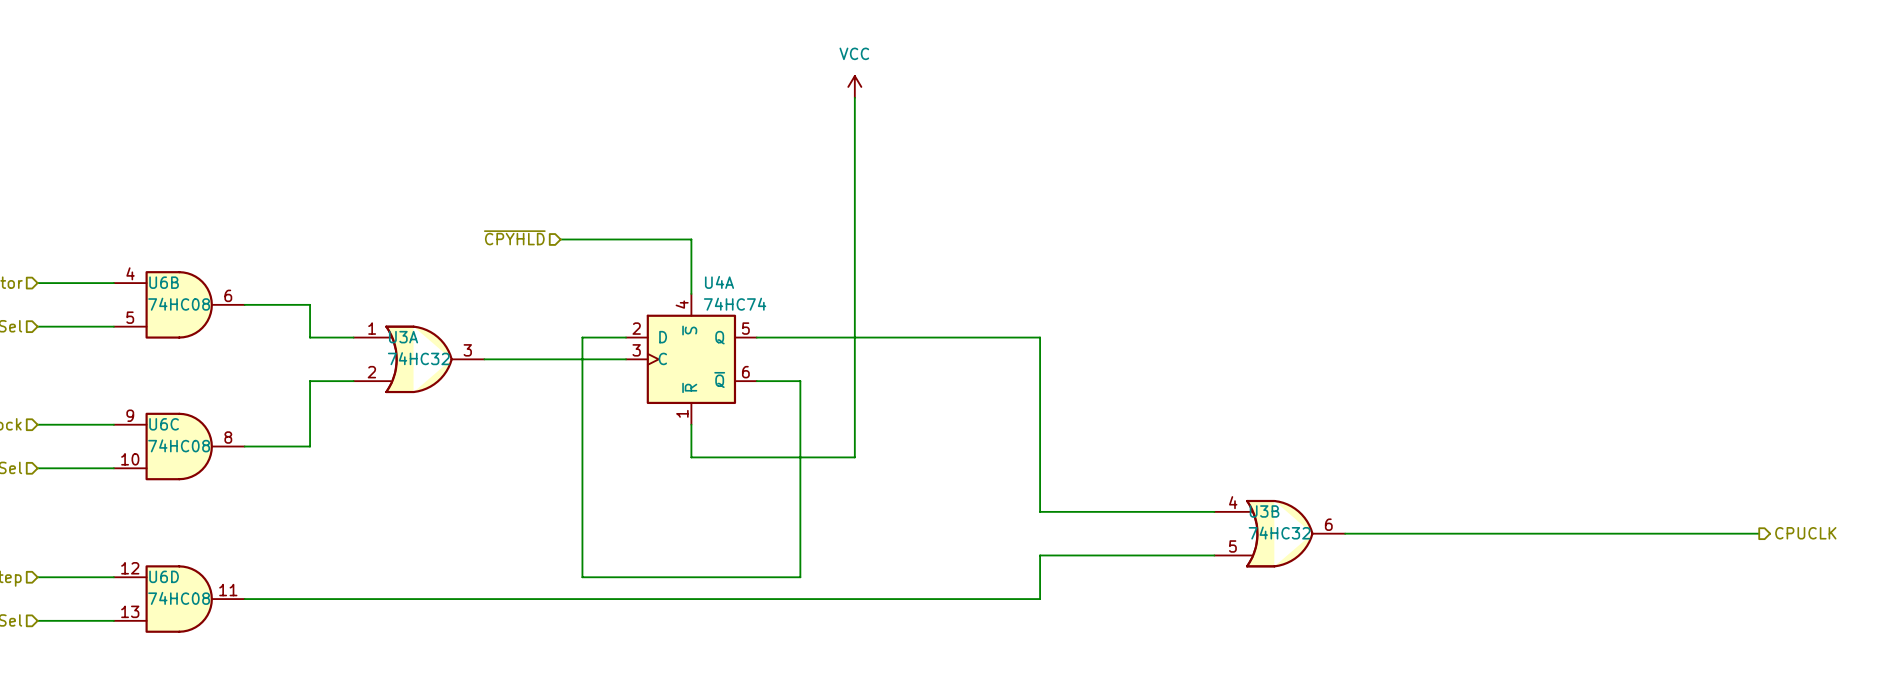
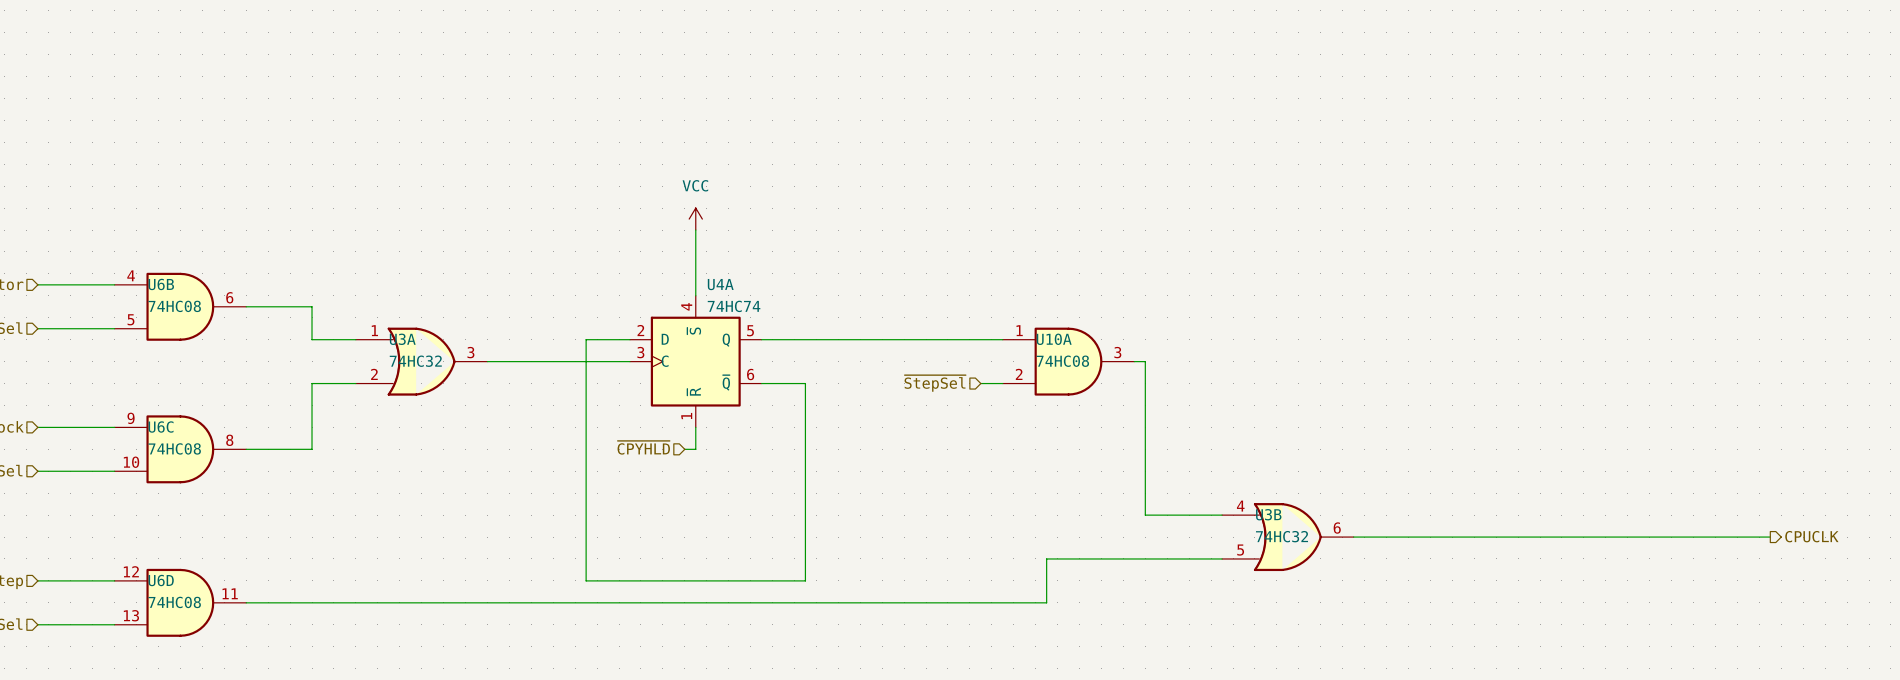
power symbol position: VCC (854, 86) -> VCC (695, 219)
wire: (854, 97) (854, 457) (691, 457) (691, 446) -> (684, 449) (695, 449)
hierarchical label: ~{CPYHLD} (514, 237) -> none
wire: (560, 239) (691, 239) -> (695, 230) (695, 241)
wire: (996, 337) (1040, 337) (1040, 511) (1138, 511) -> (1134, 361) (1145, 361) (1145, 515)
U10A: none -> 74HC08 (1068, 361)
hierarchical label: none -> ~{StepSel} (935, 383)
wire: none -> (980, 383) (1002, 383)
hierarchical label: none -> ~{CPYHLD} (643, 447)

